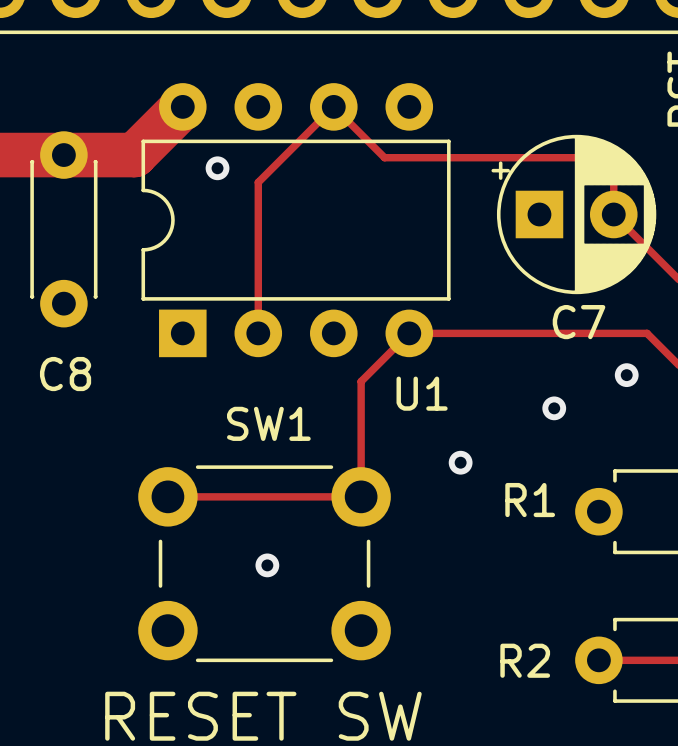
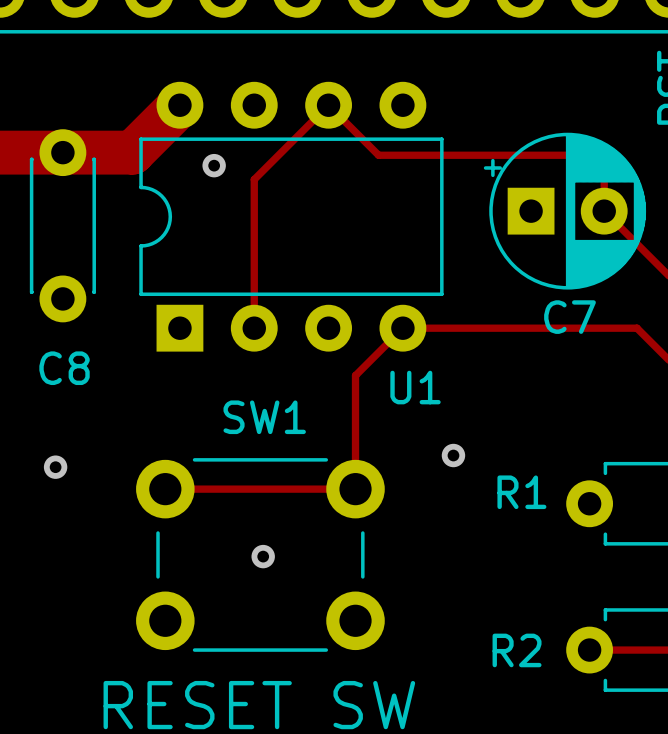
via: (626, 375) -> none
via: (554, 408) -> none
via: none -> (55, 467)

